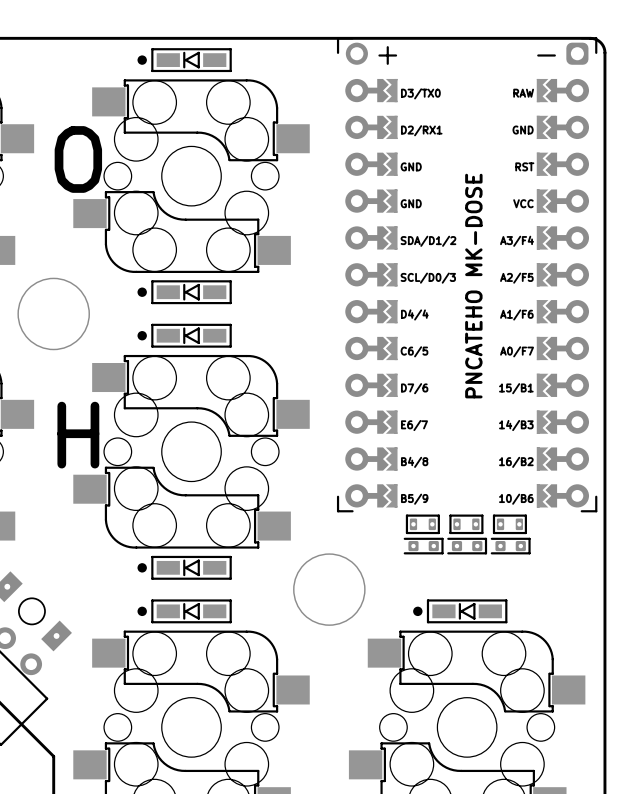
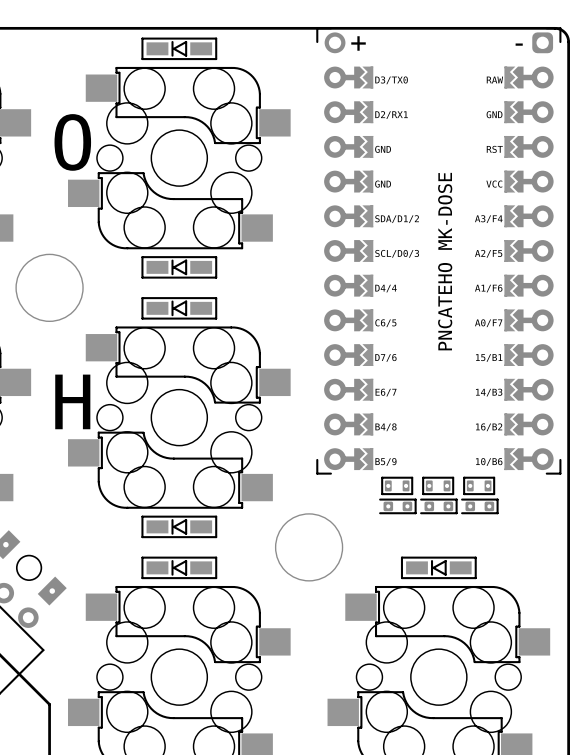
part footprint: [137, 48, 232, 73] -> [141, 37, 218, 61]
part footprint: [137, 280, 232, 305] -> [141, 256, 218, 279]
part footprint: [137, 323, 232, 348] -> [141, 297, 218, 320]
part footprint: [137, 555, 232, 580] -> [141, 515, 218, 539]
part footprint: [137, 599, 232, 624] -> [141, 556, 218, 580]
part footprint: [413, 599, 508, 624] -> [400, 556, 477, 580]

